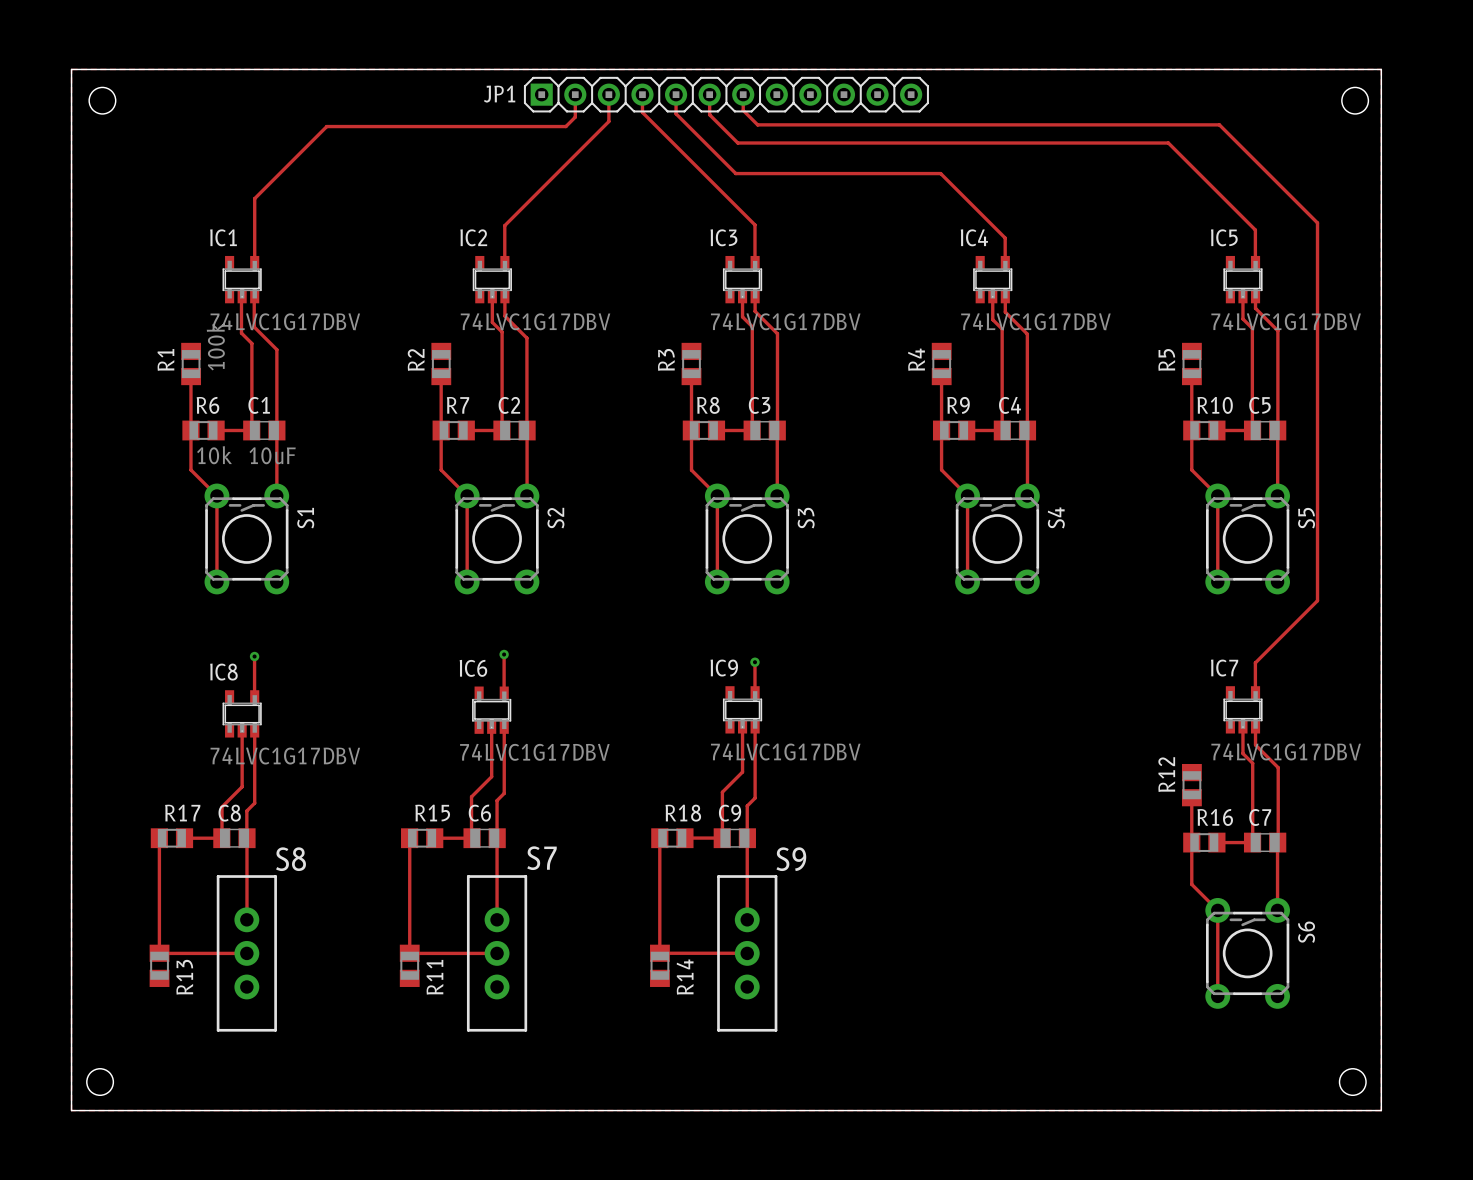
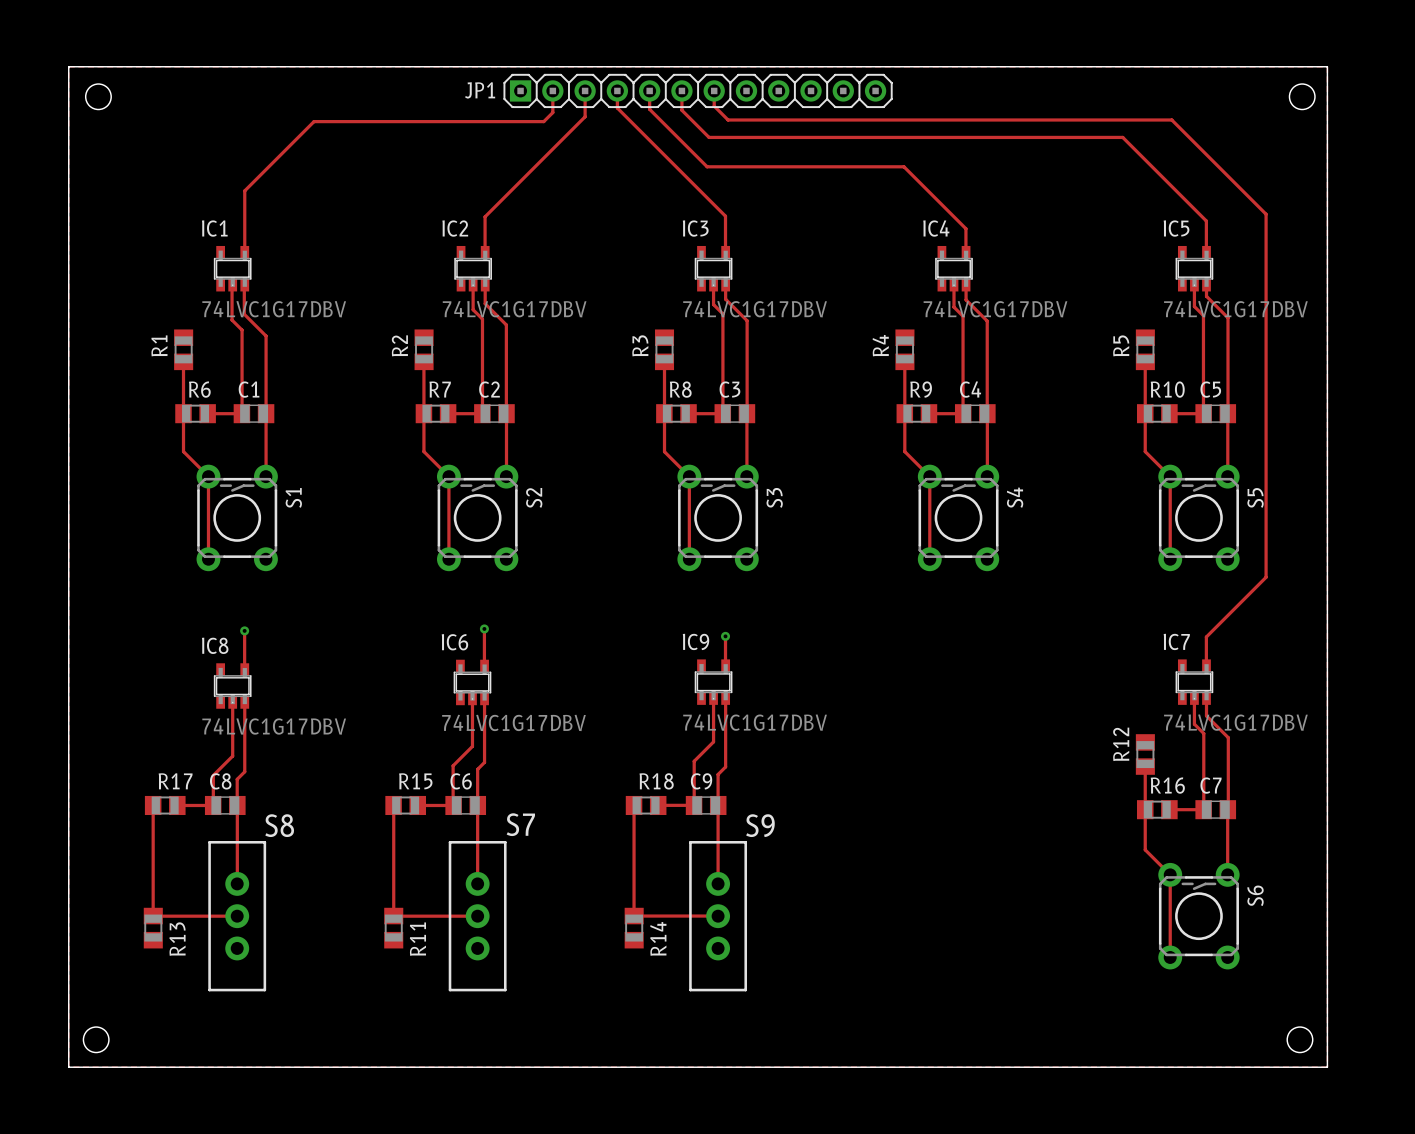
R1 value: 100k (215, 346) -> none
R6 value: 10k (214, 455) -> none
C1 value: 10uF (272, 455) -> none

